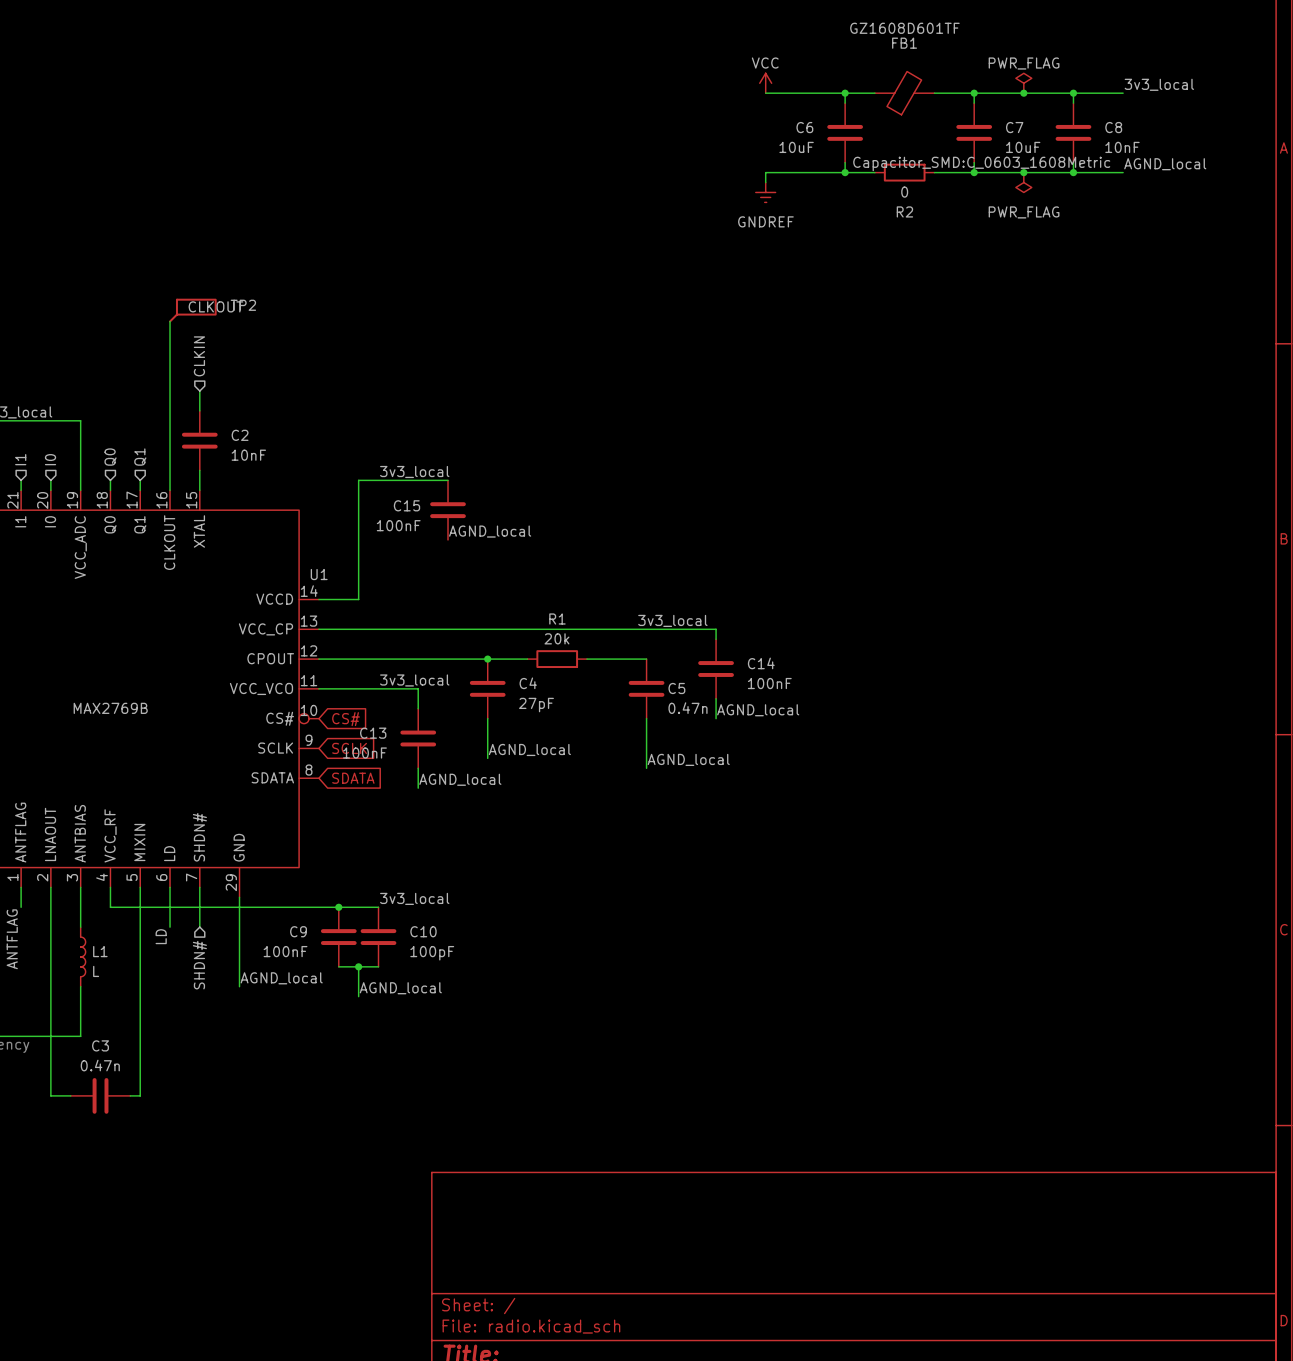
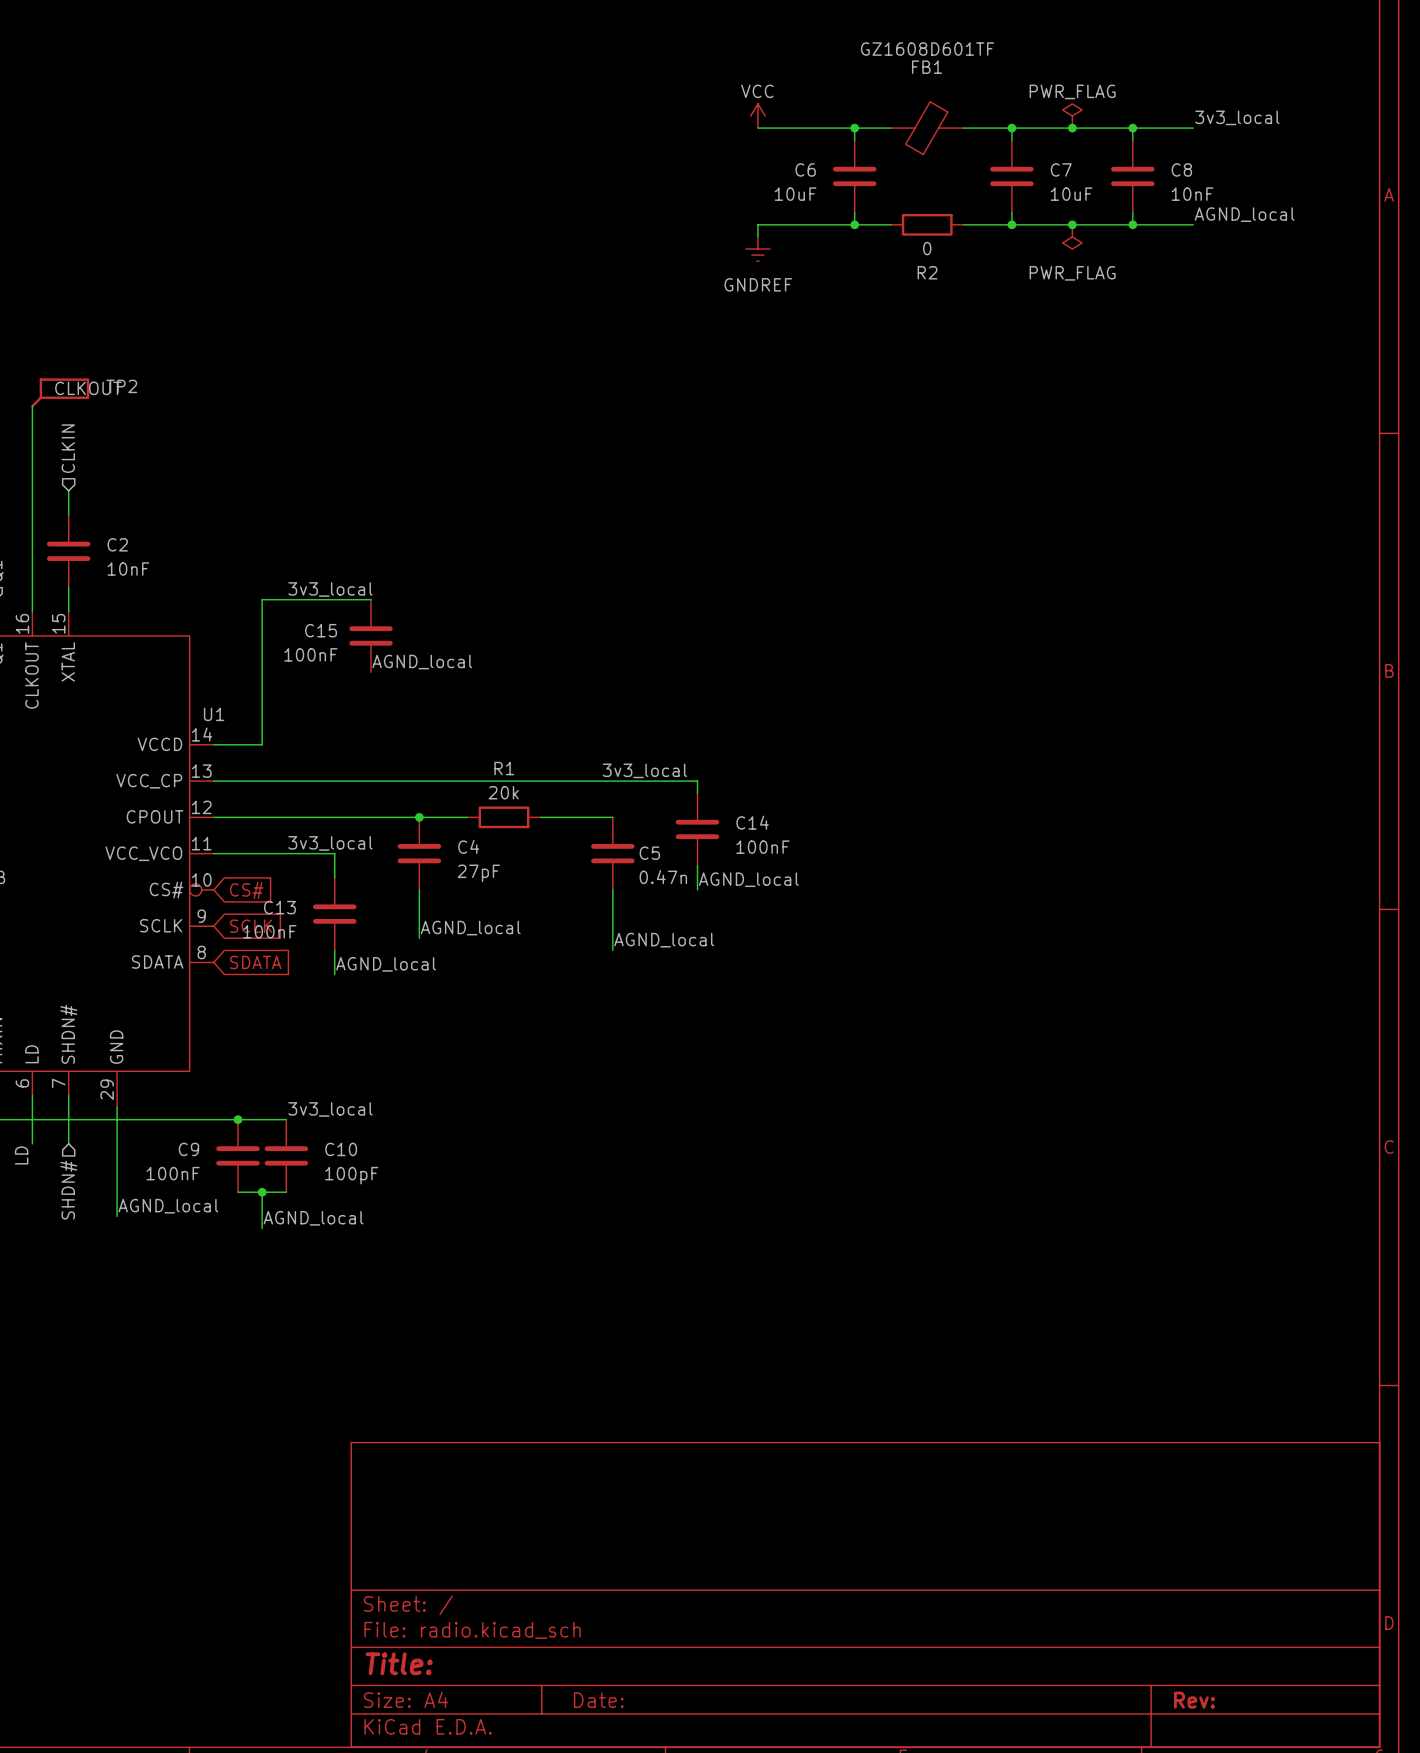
C7 text: Capacitor_SMD:C_0603_1608Metric (981, 163) -> none

